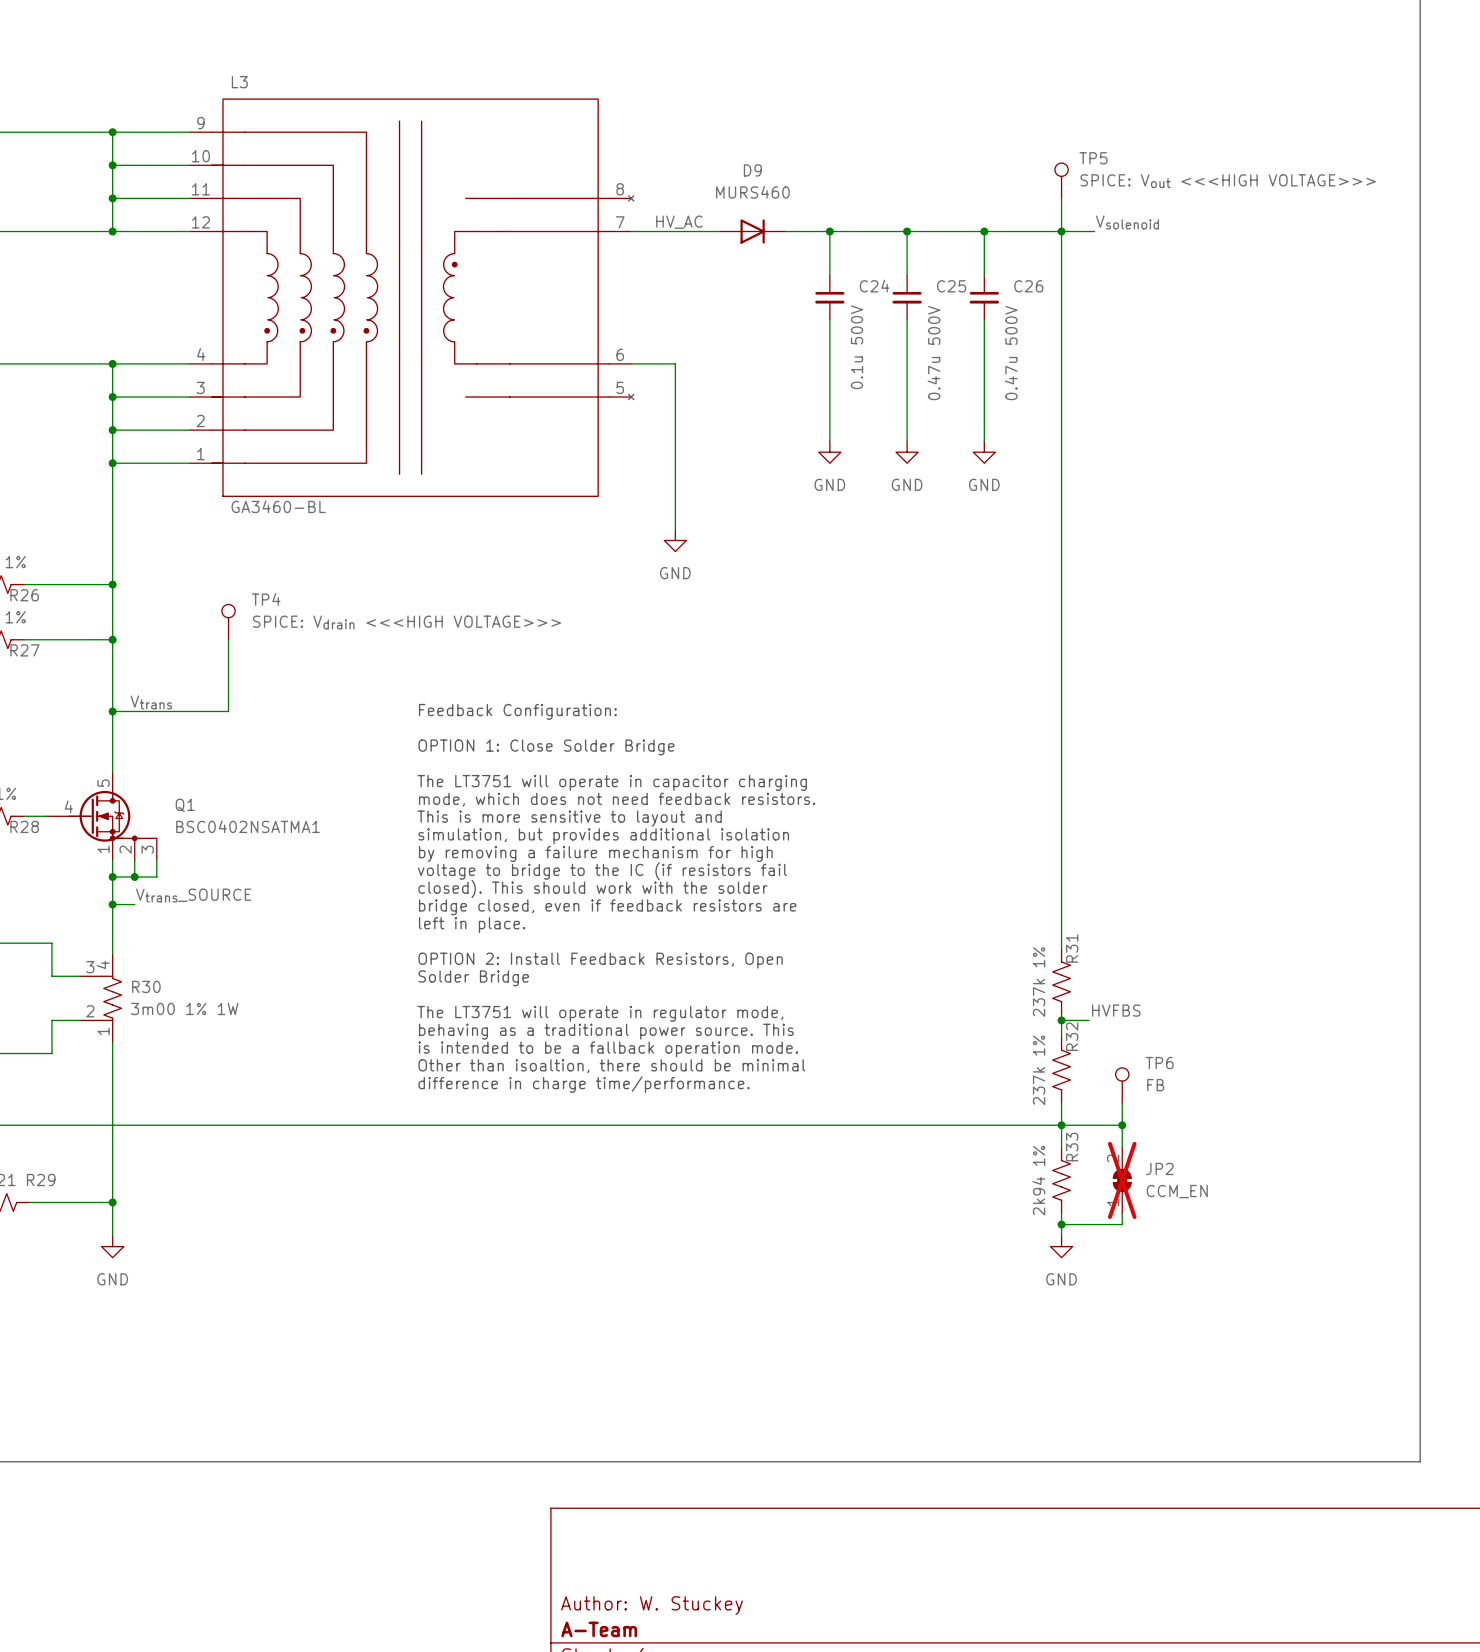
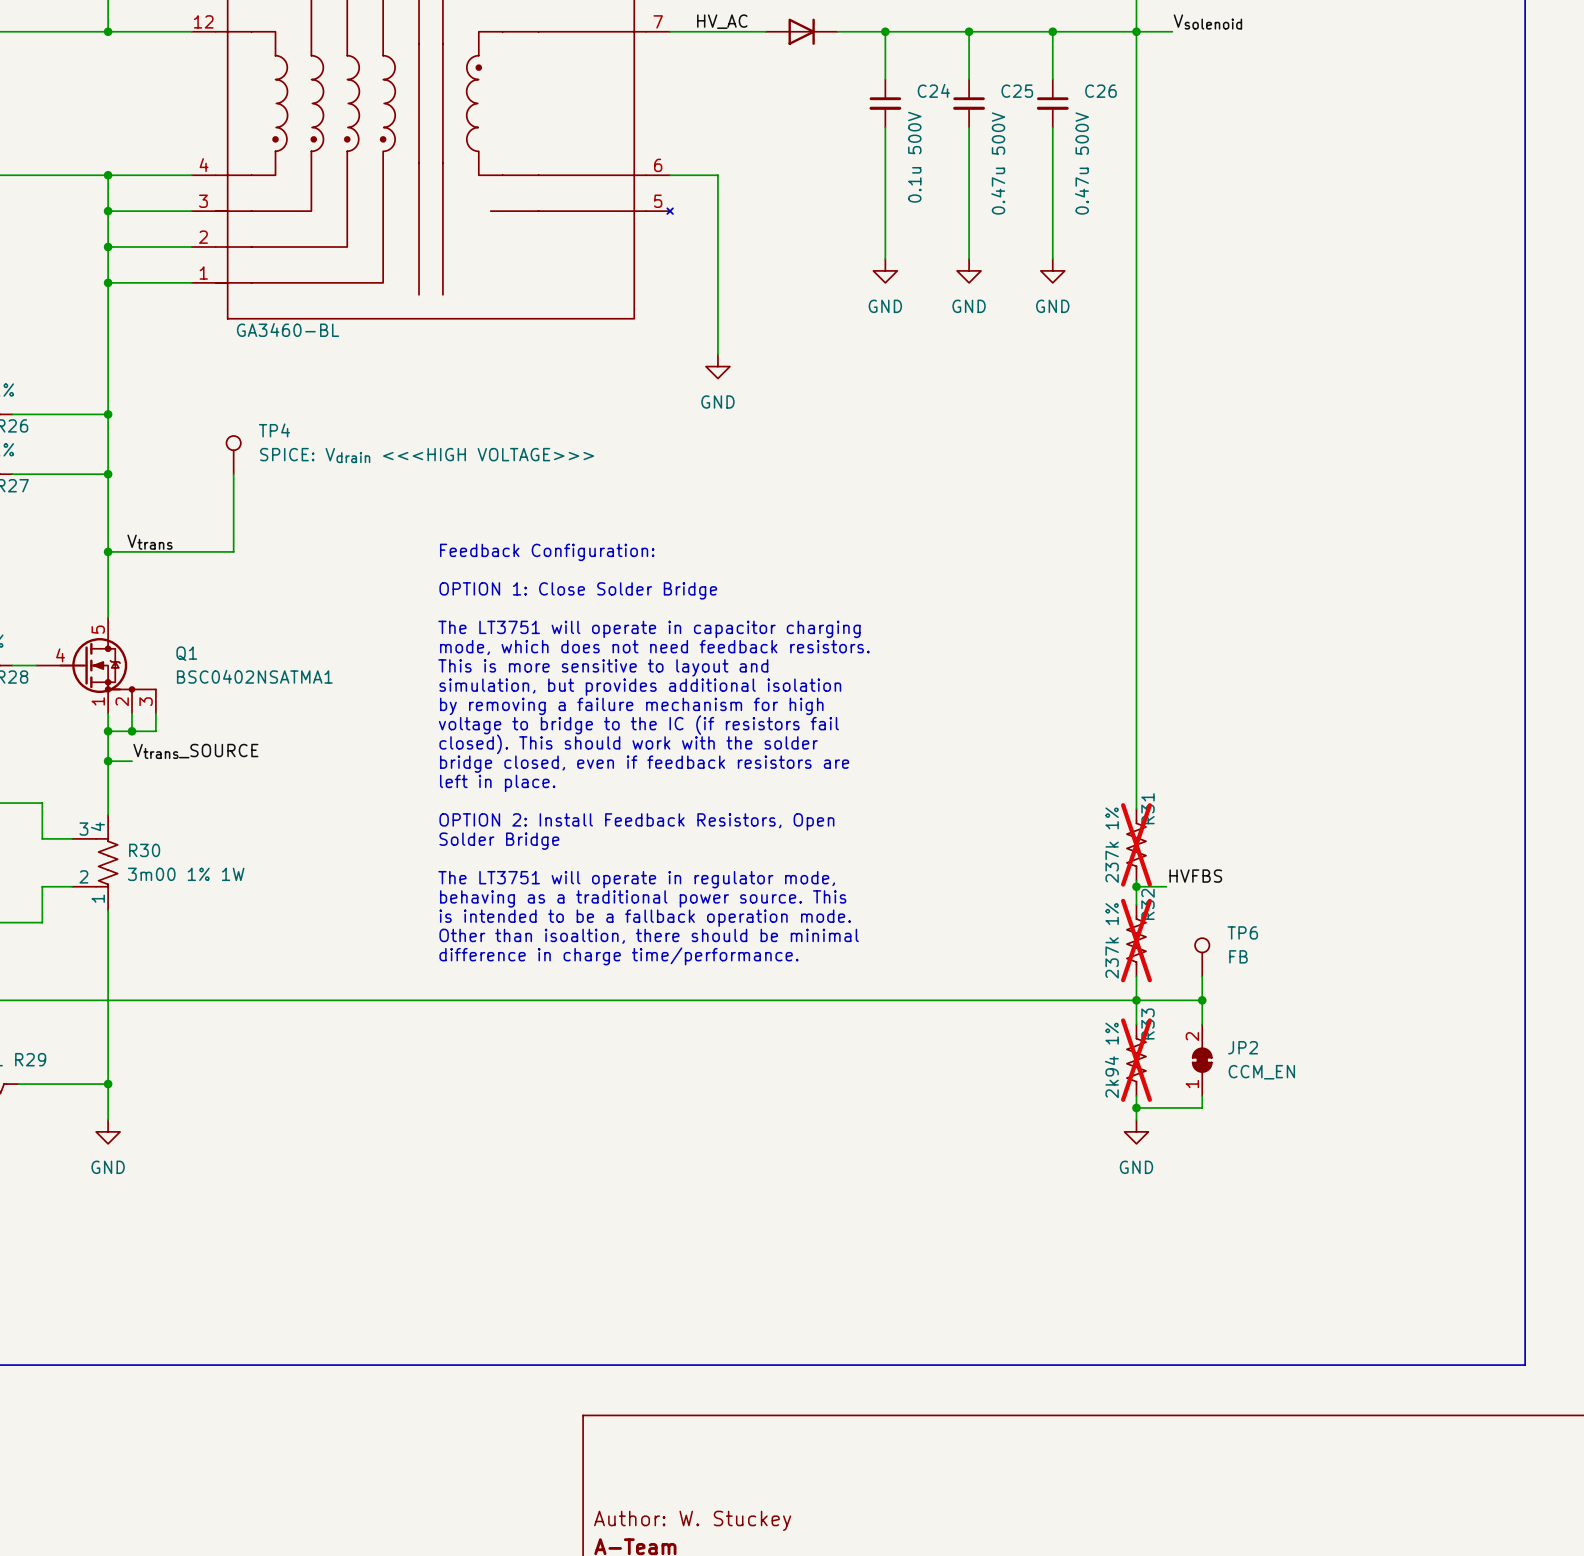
R31 do-not-place cross: none -> (1136, 844)
R32 do-not-place cross: none -> (1136, 940)
R33 do-not-place cross: none -> (1136, 1060)
JP2 do-not-place cross: (1122, 1180) -> none

